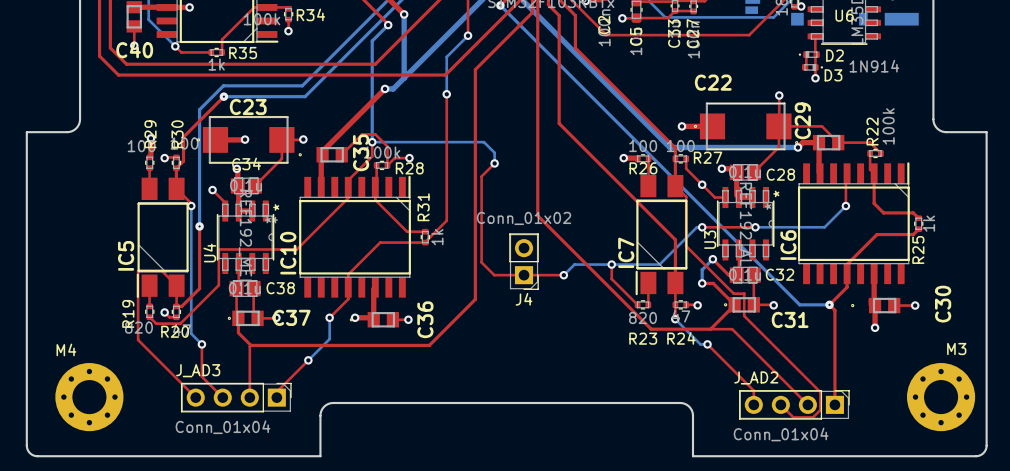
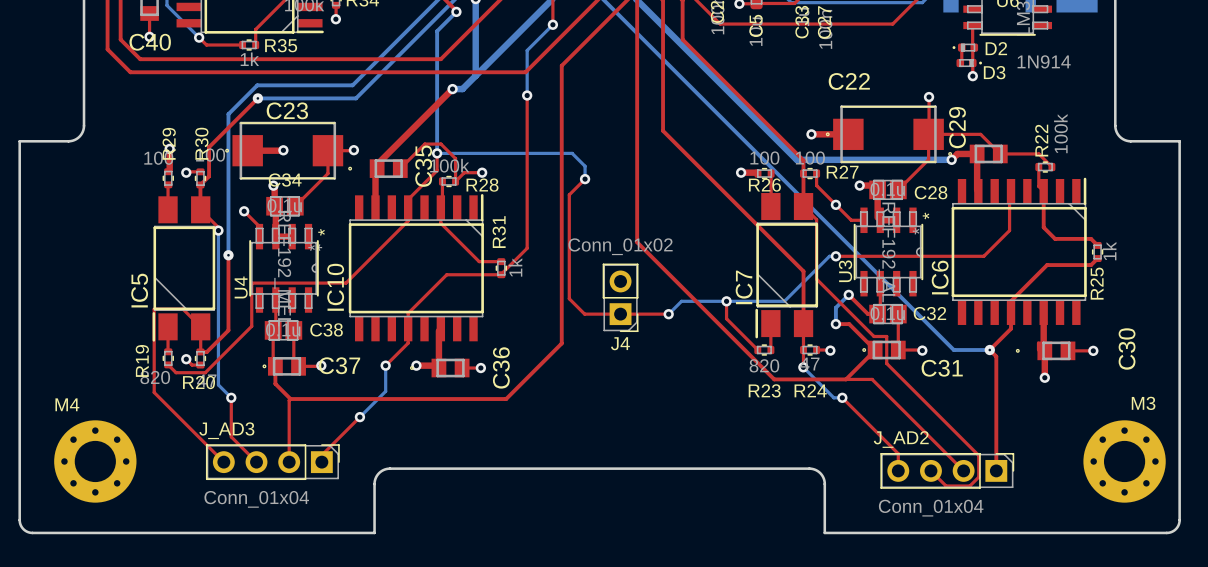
top track: none -> (1009, 230) (983, 256) (900, 256)
bottom track: (845, 206) (824, 227) (755, 227) -> none
via: (845, 206) -> none
via: (755, 227) -> none

